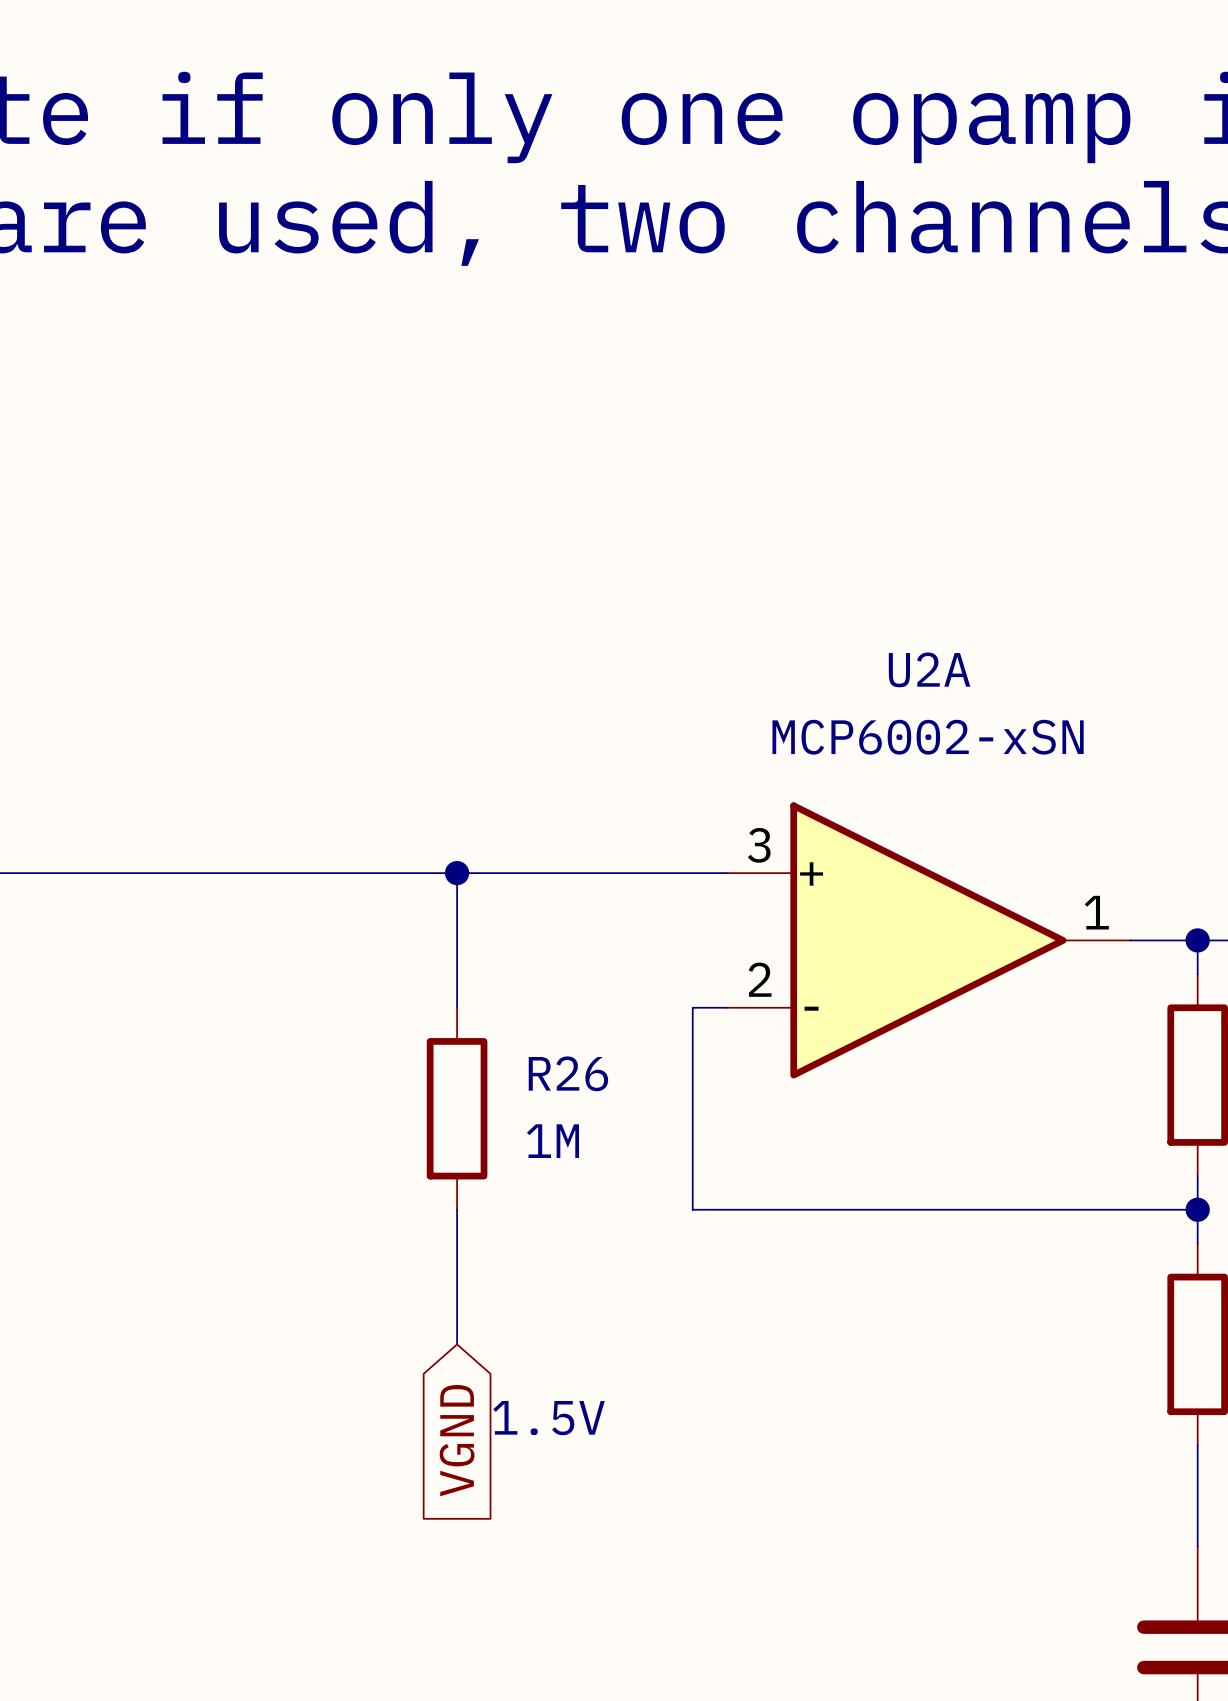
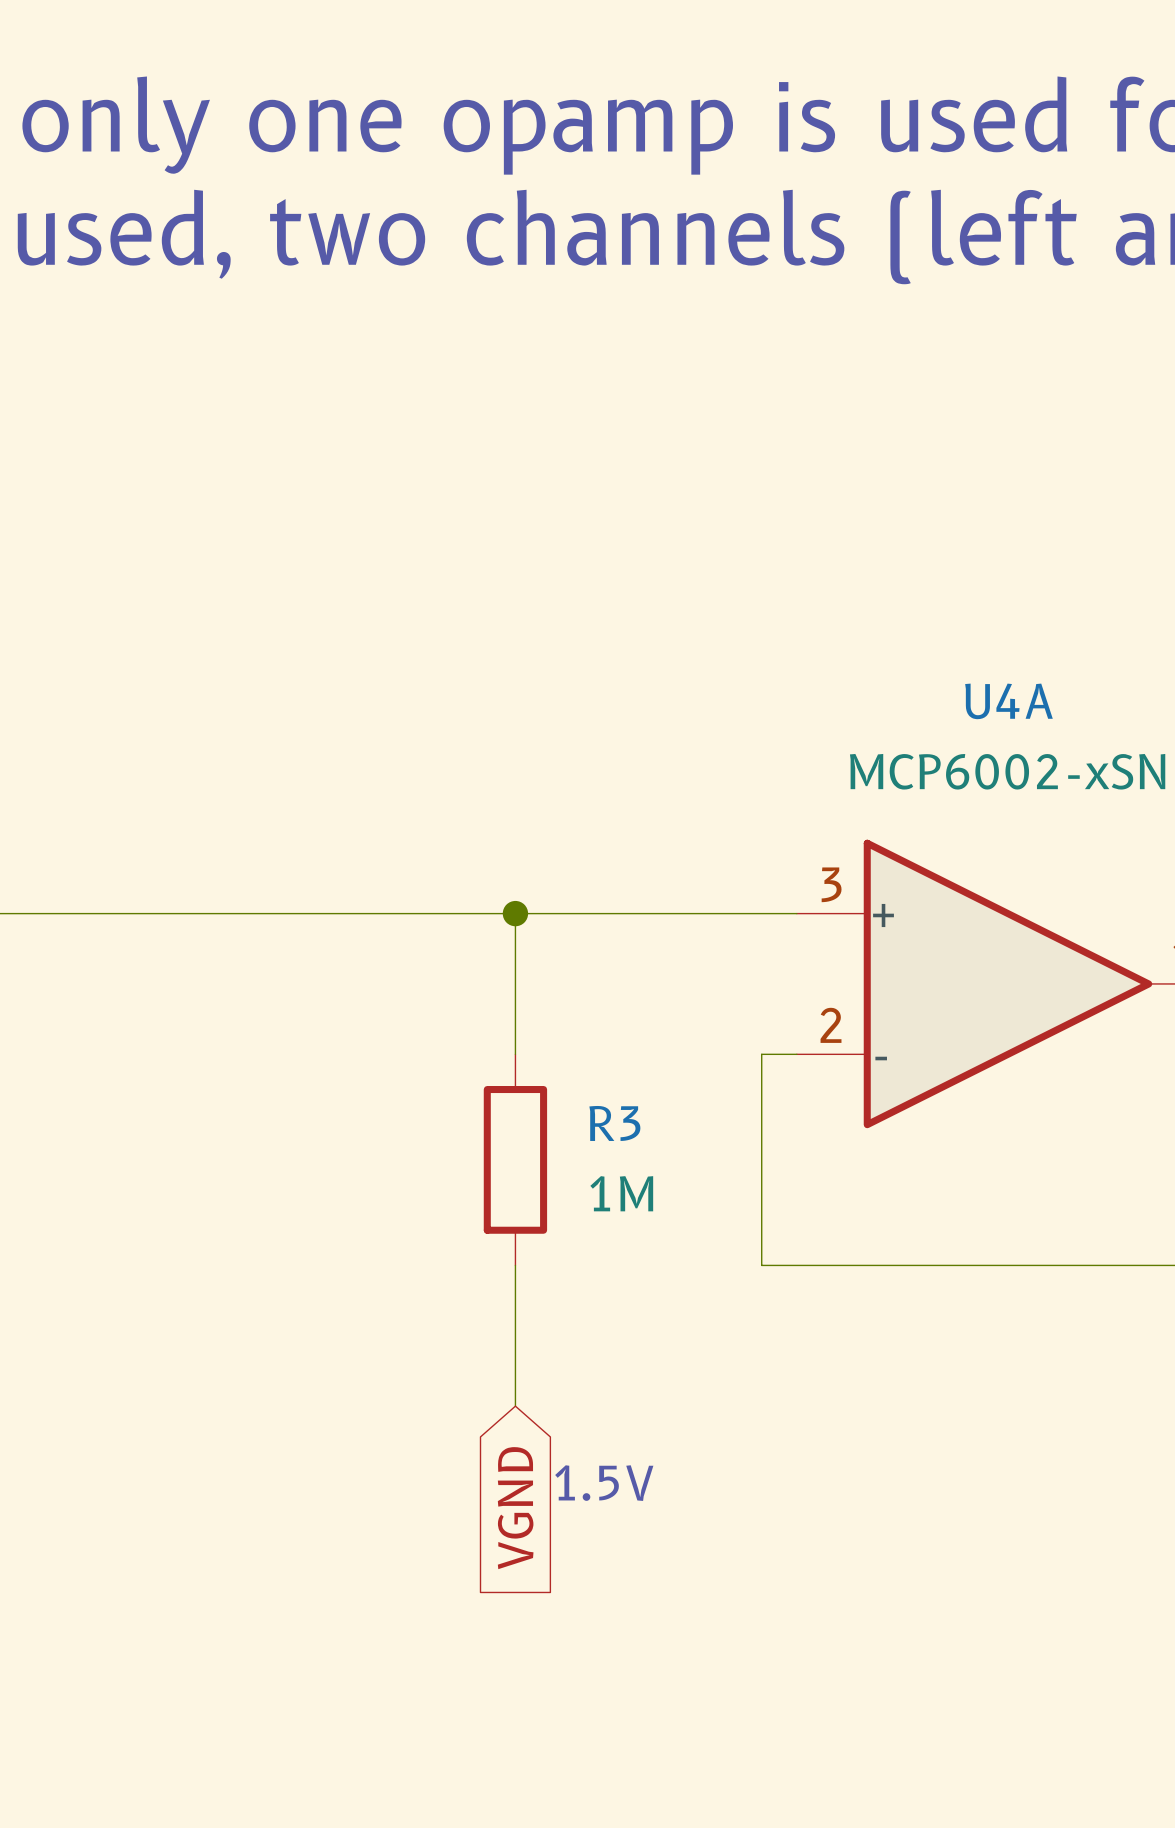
U2A name: U2A (929, 669) -> U4A (1008, 701)
R26 name: R26 (568, 1073) -> R3 (614, 1123)

